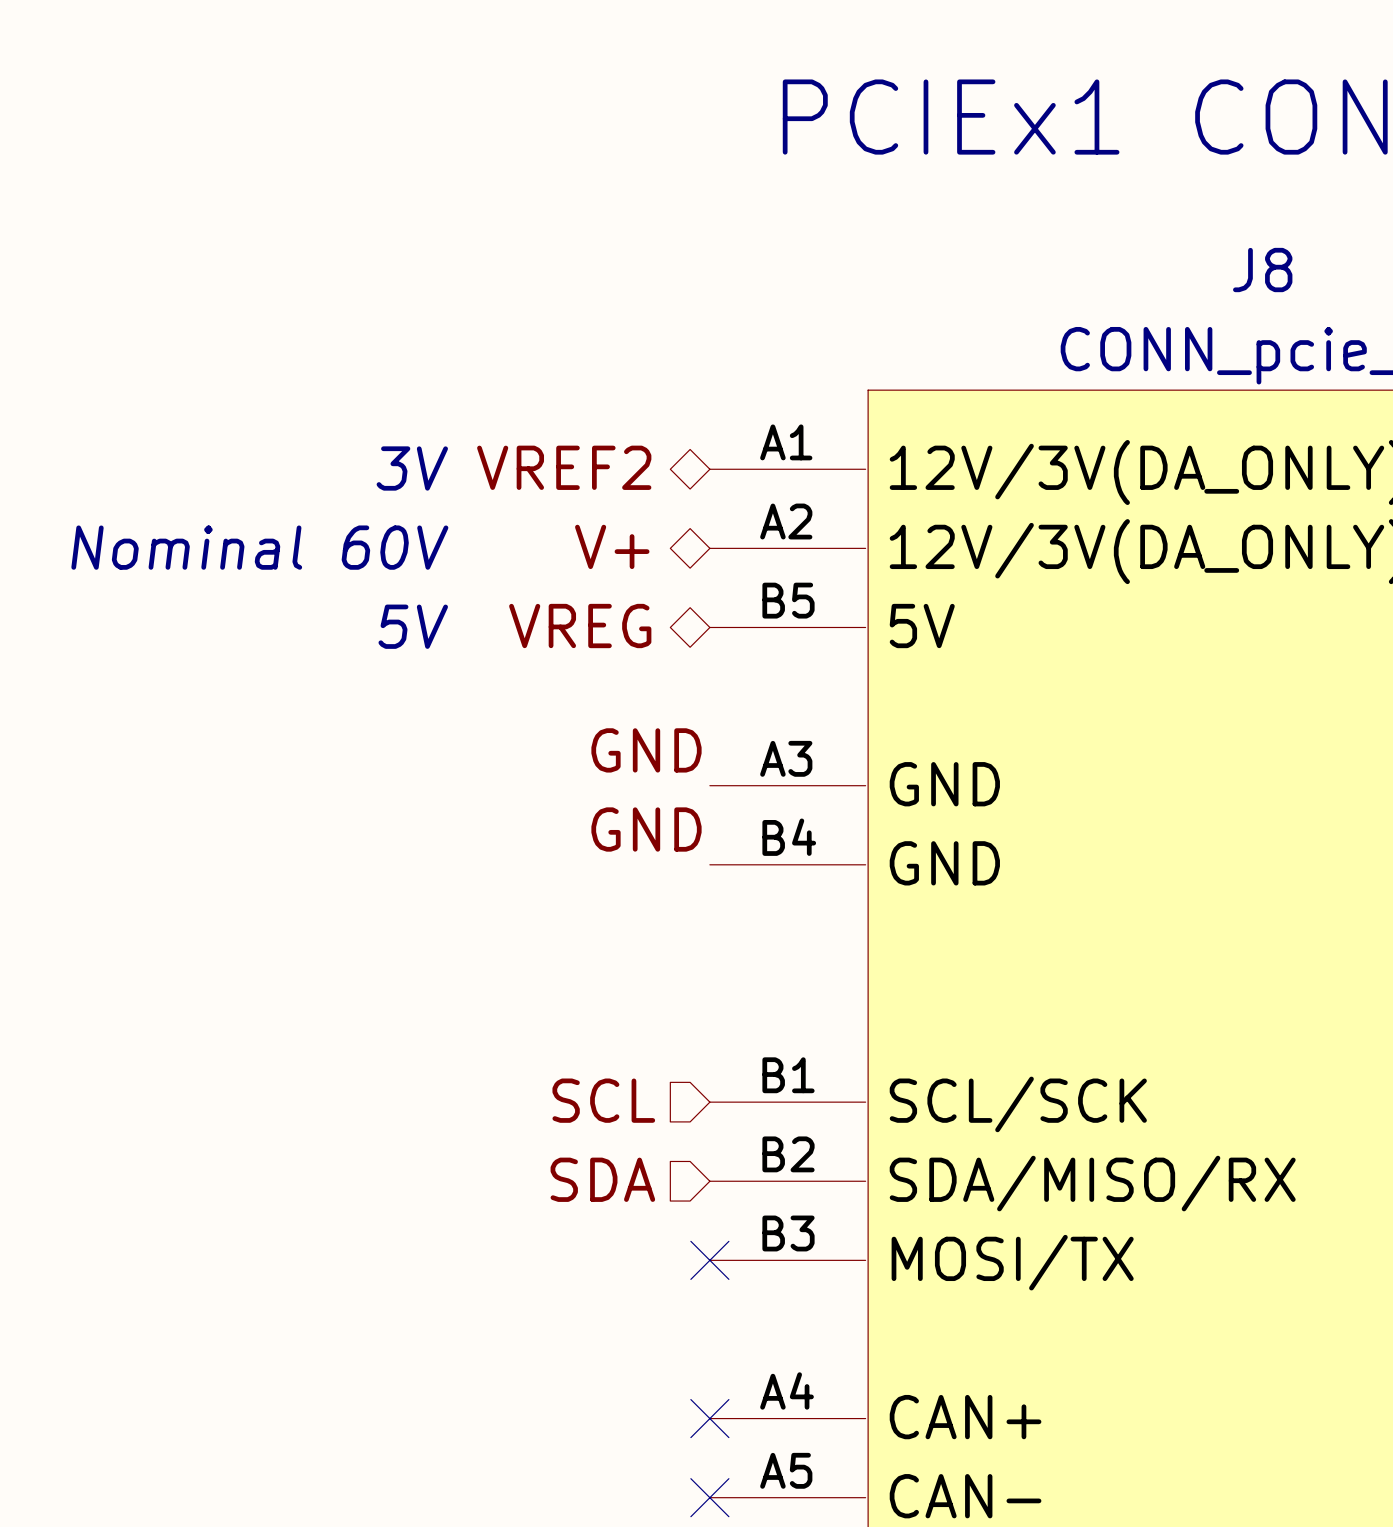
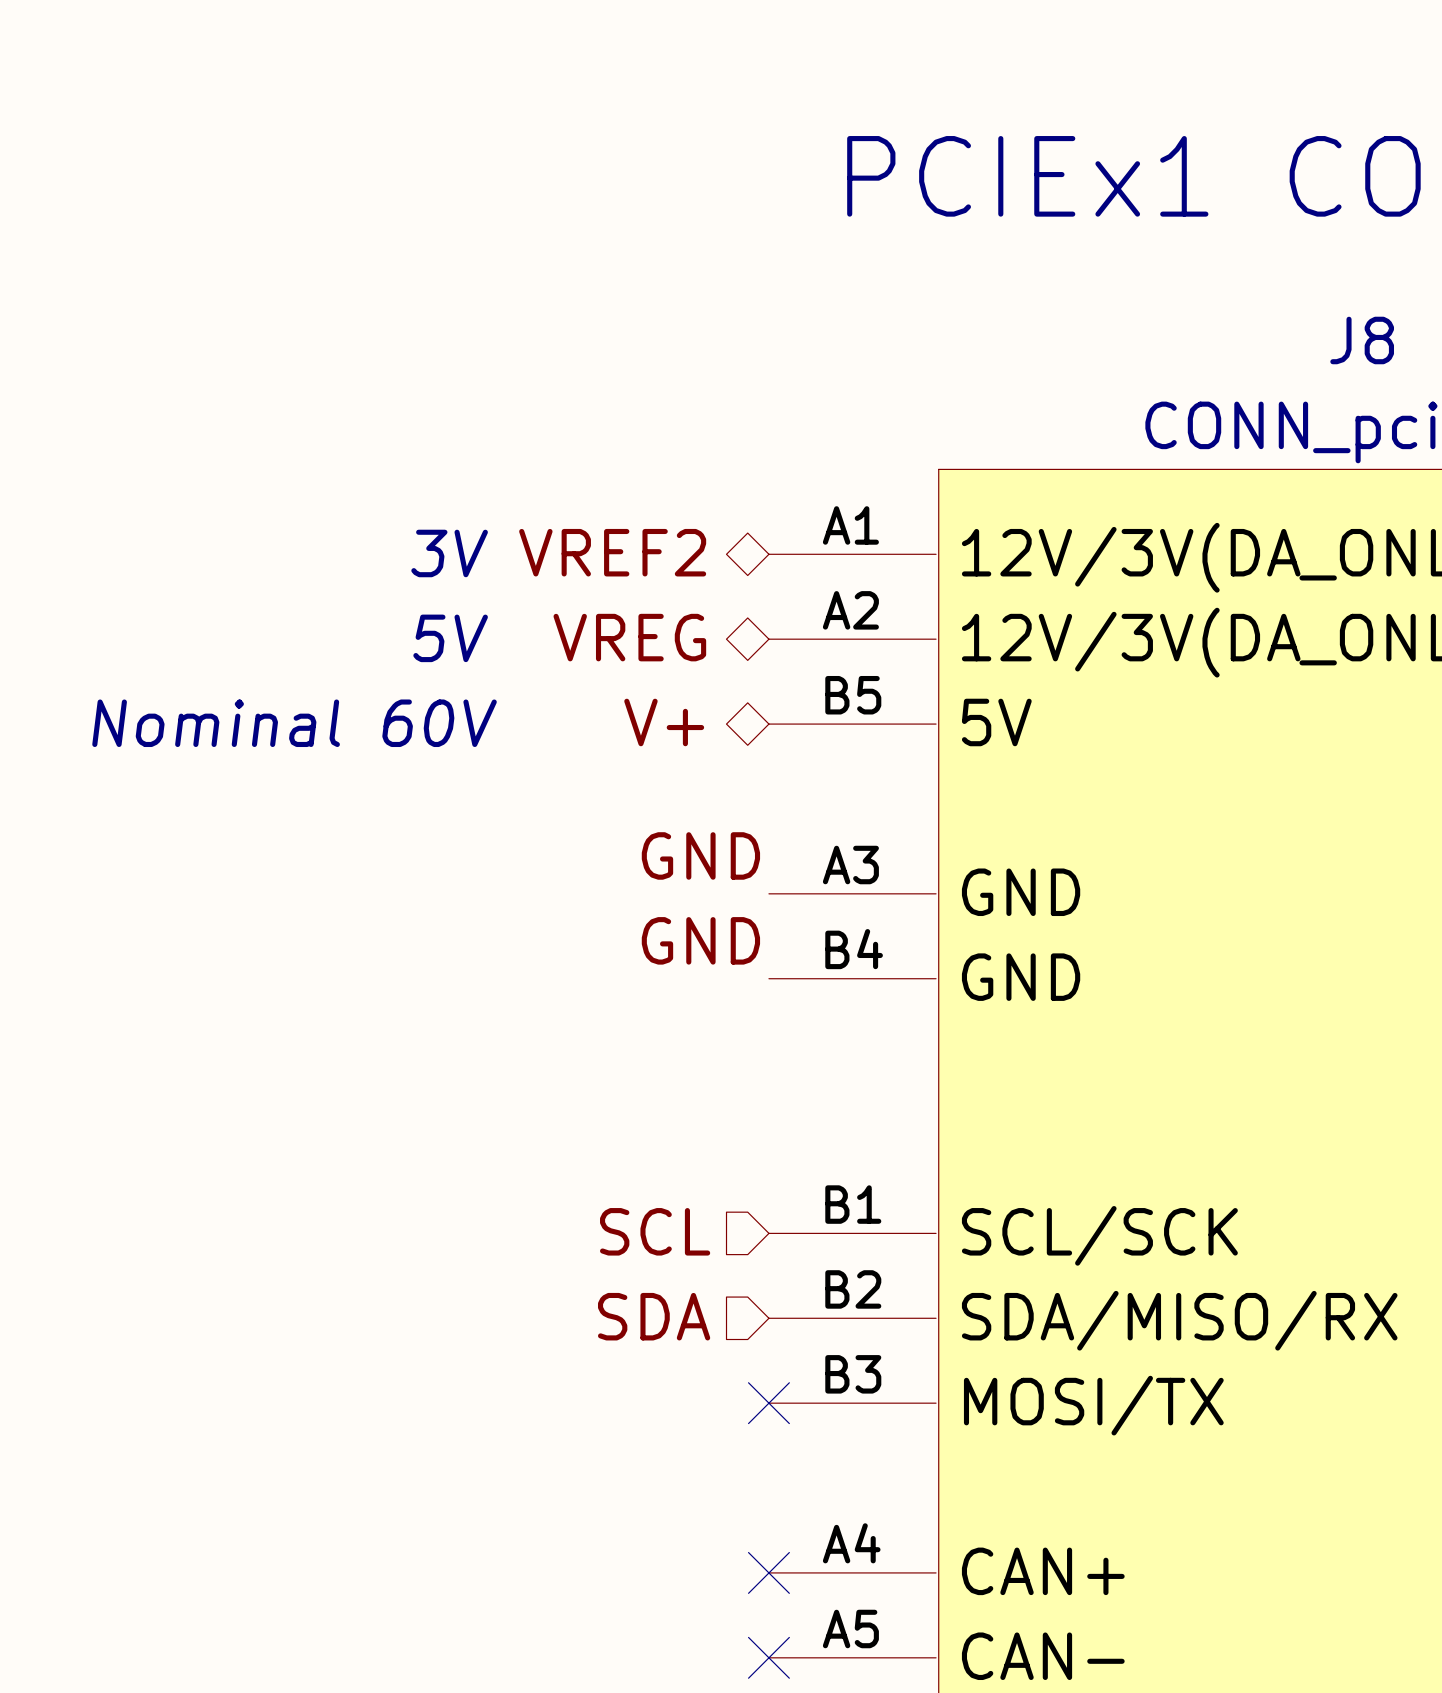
hierarchical label: V+ (612, 546) -> VREG (629, 637)
text position: Nominal 60V (259, 547) -> Nominal 60V (294, 723)
text position: 5V (413, 626) -> 5V (450, 638)
hierarchical label: VREG (580, 626) -> V+ (664, 722)

